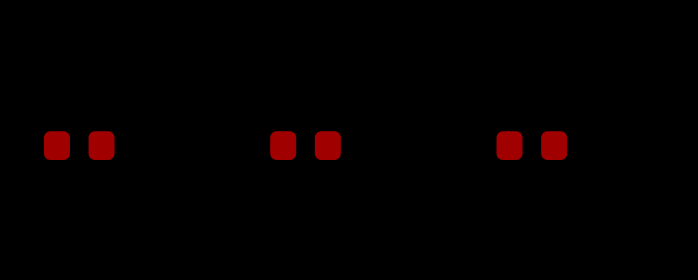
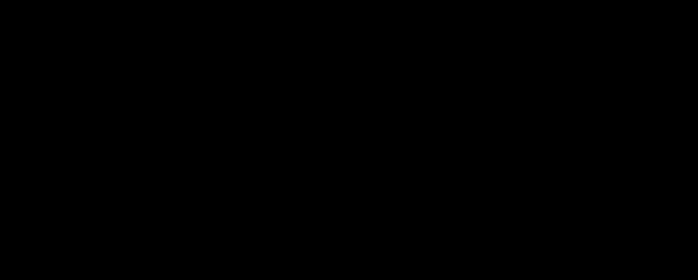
part: (79, 145) -> none
part: (305, 145) -> none
part: (531, 145) -> none

